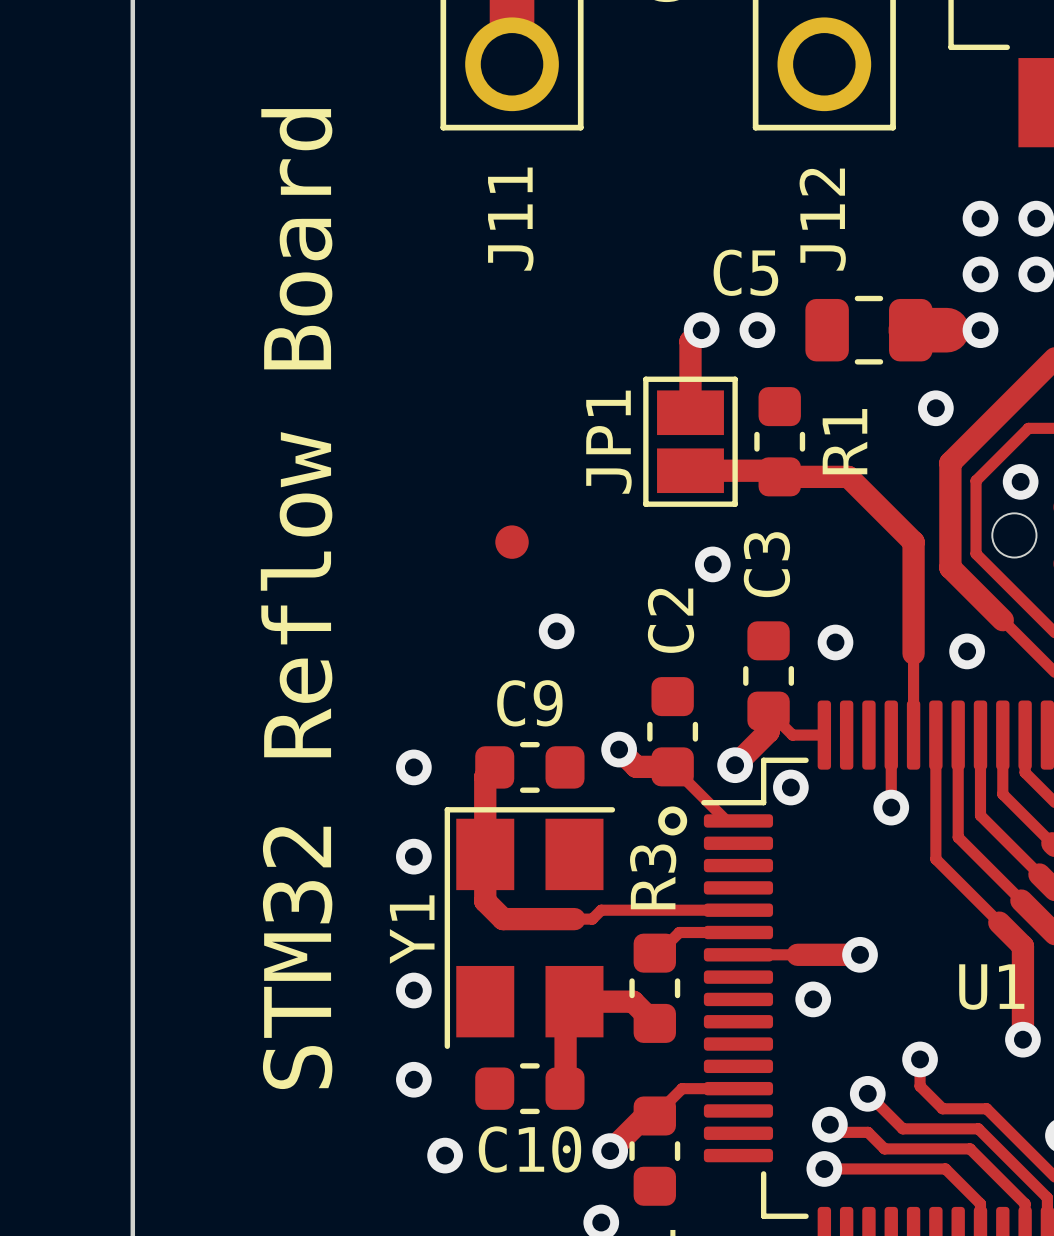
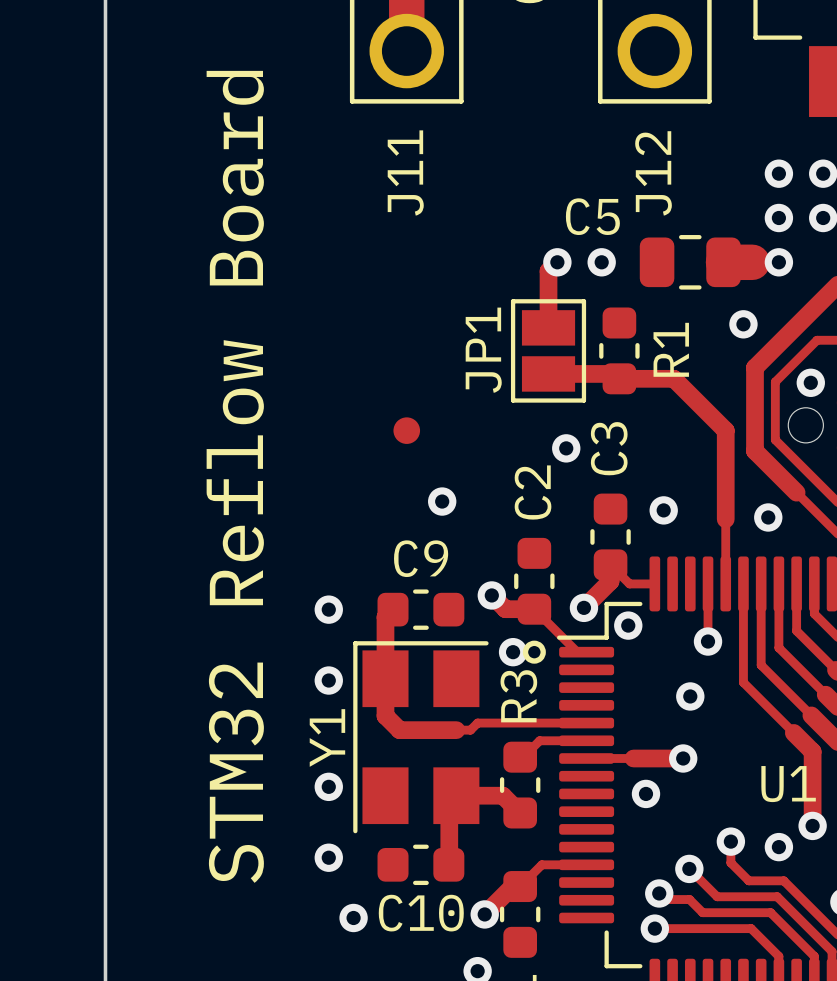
via: none -> (513, 652)
via: none -> (690, 696)
via: none -> (778, 847)

